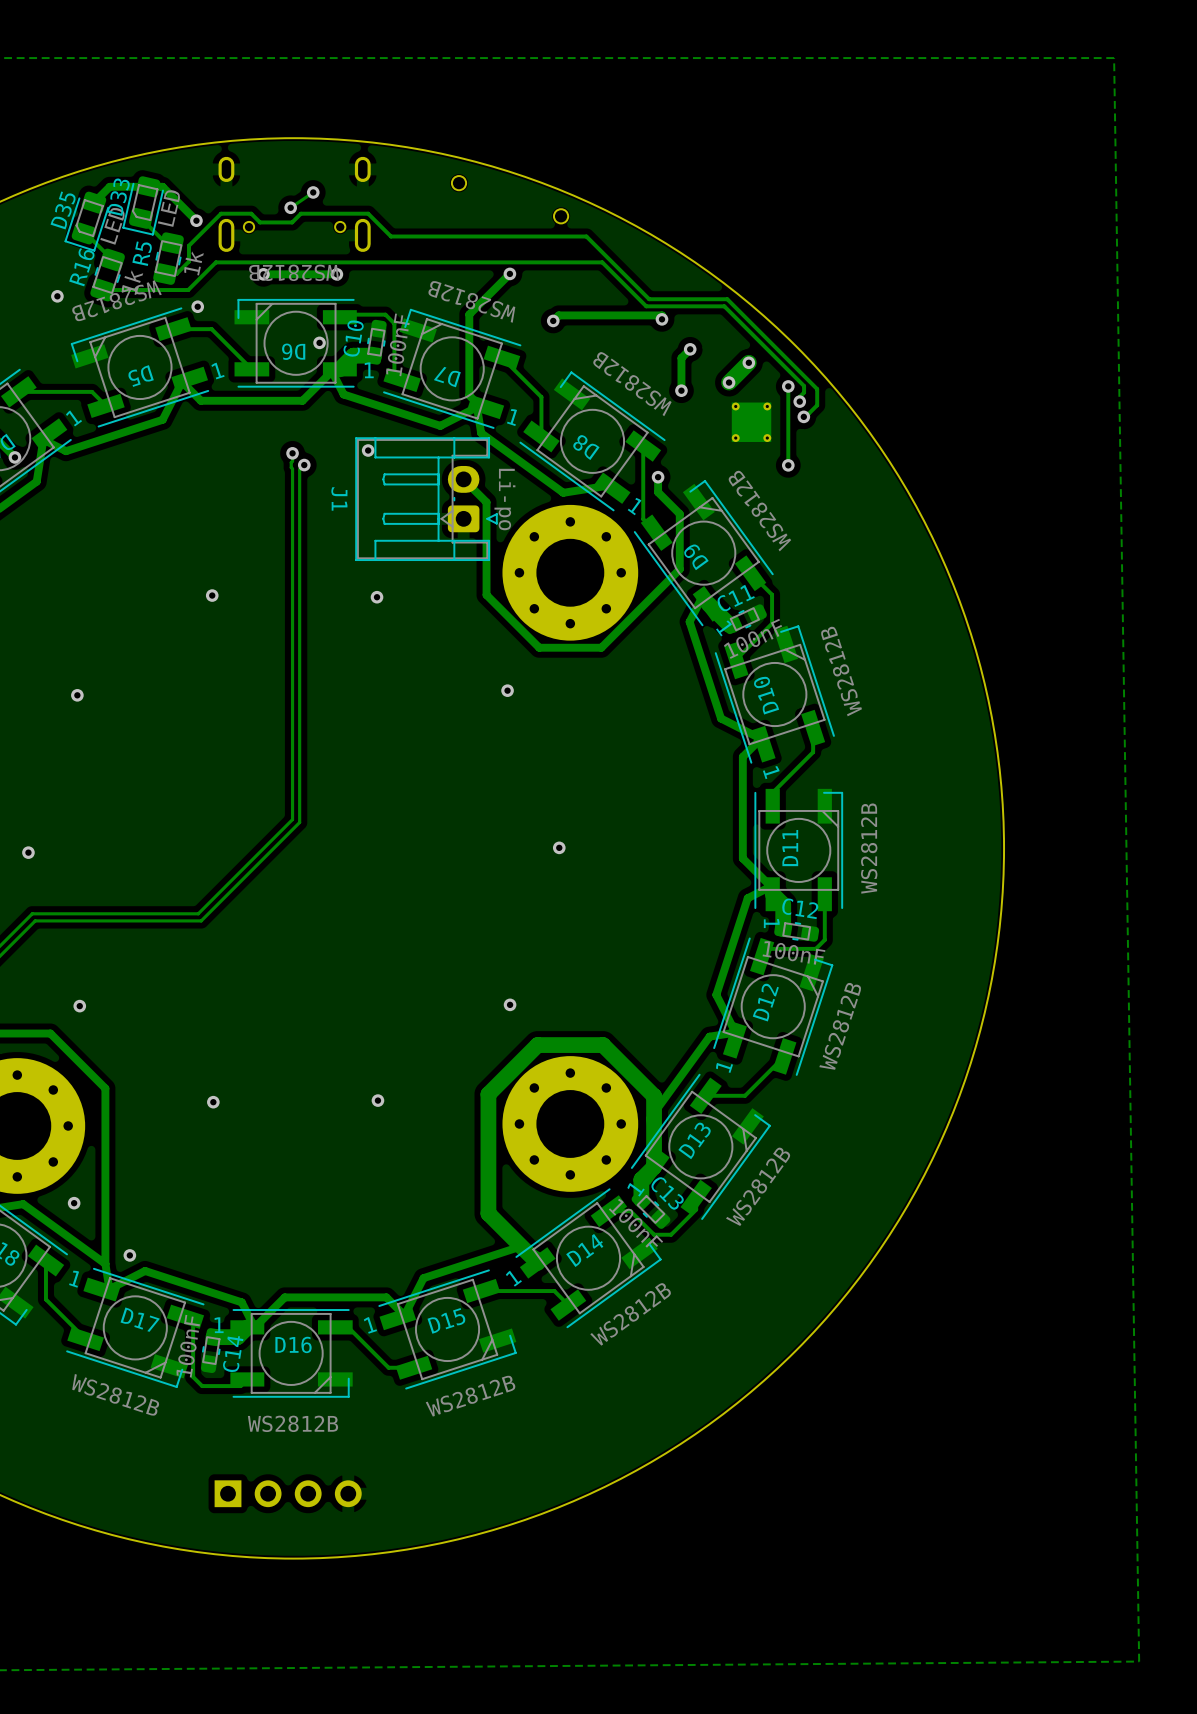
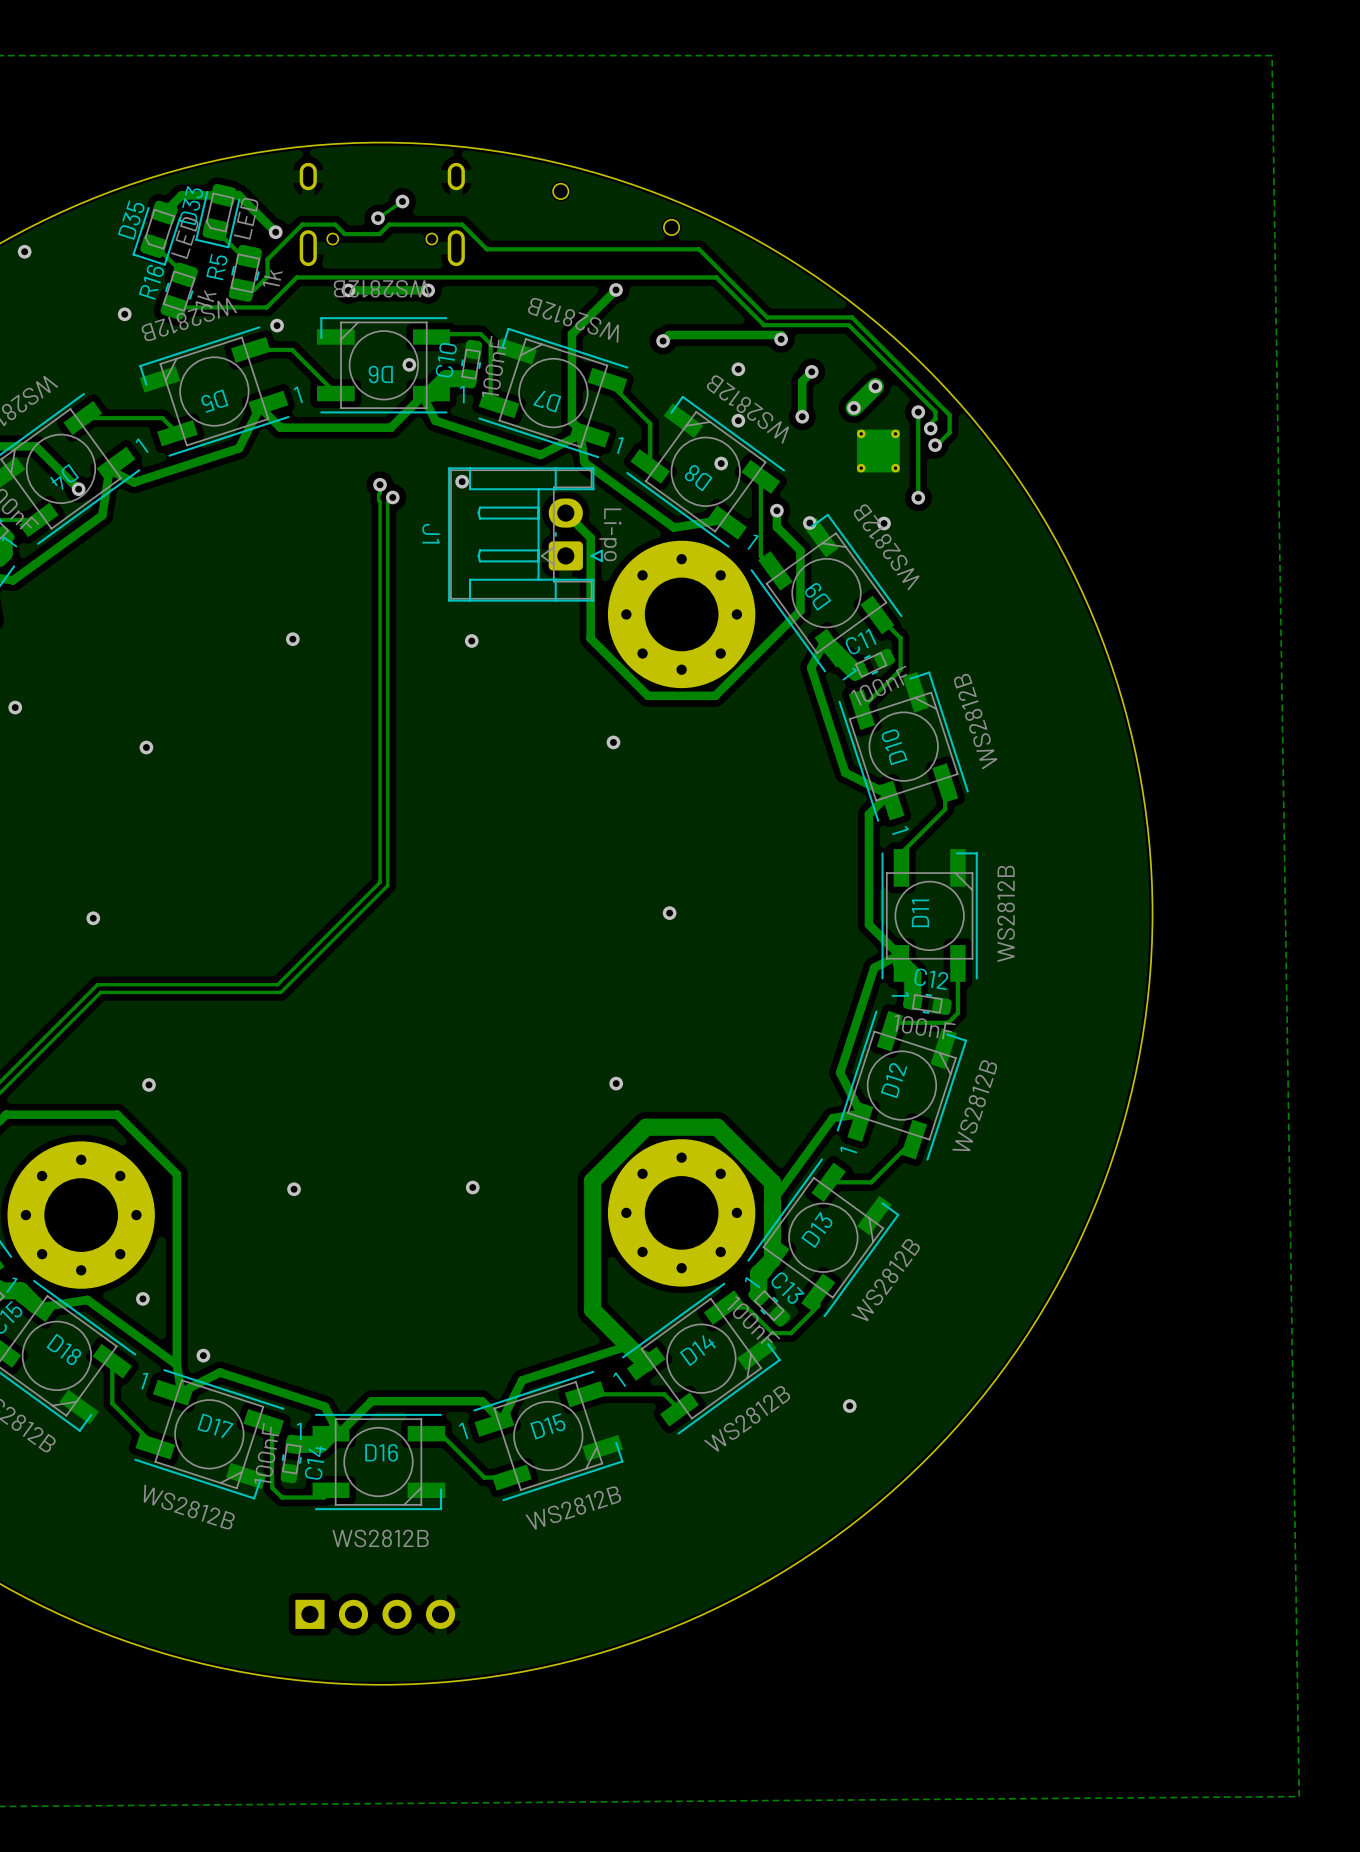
via: none -> (738, 369)
via: none -> (738, 420)
via: none -> (721, 463)
via: none -> (809, 523)
via: none -> (884, 523)
via: none -> (849, 1405)

